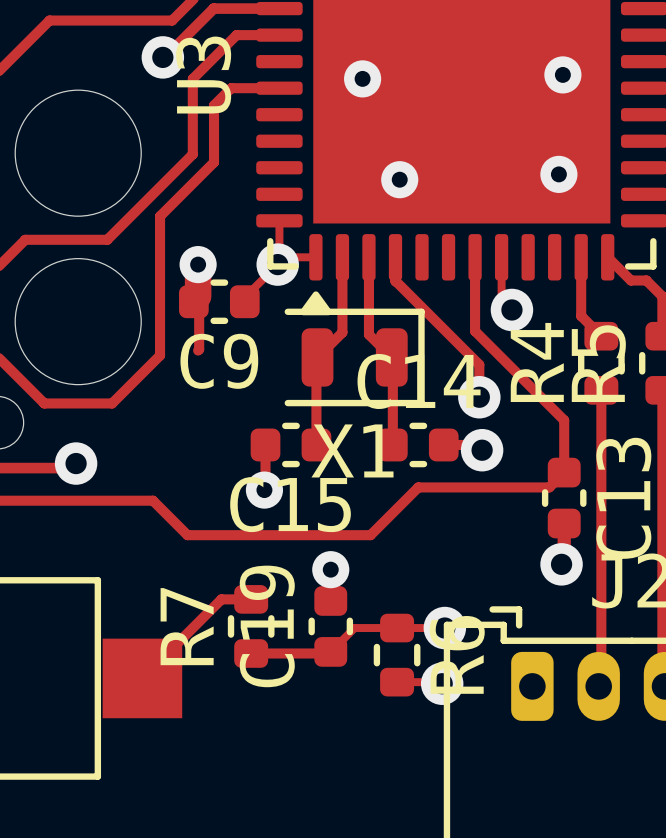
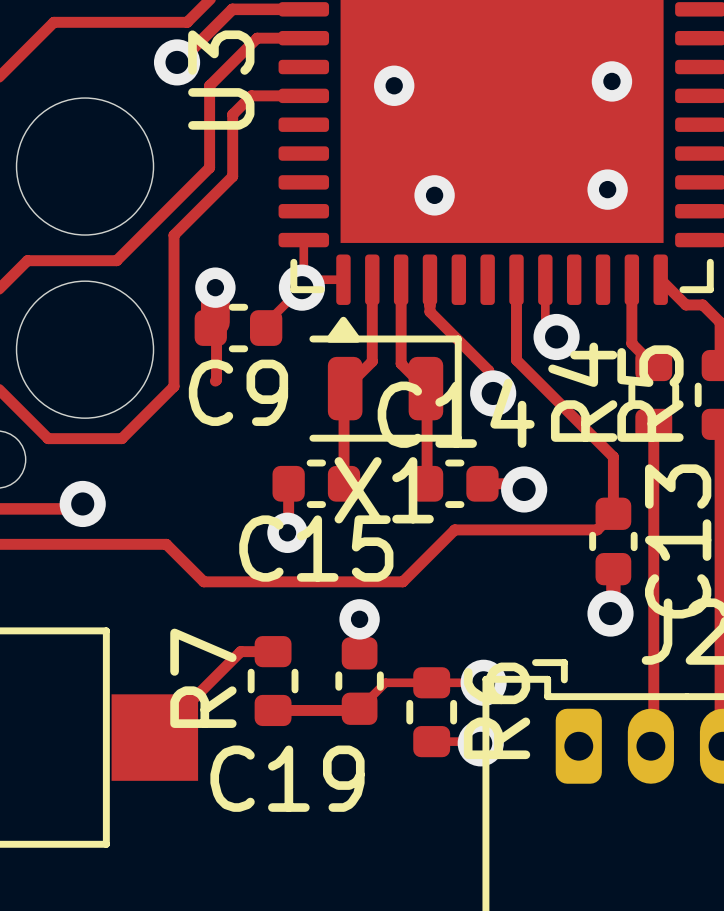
track: (395, 280) (479, 364) (479, 397) -> (429, 306) (429, 311) (488, 370) (488, 389) (493, 393)
via position: (479, 397) -> (493, 393)
C19 name rotation: 0° (267, 626) -> 90° clockwise (287, 778)

